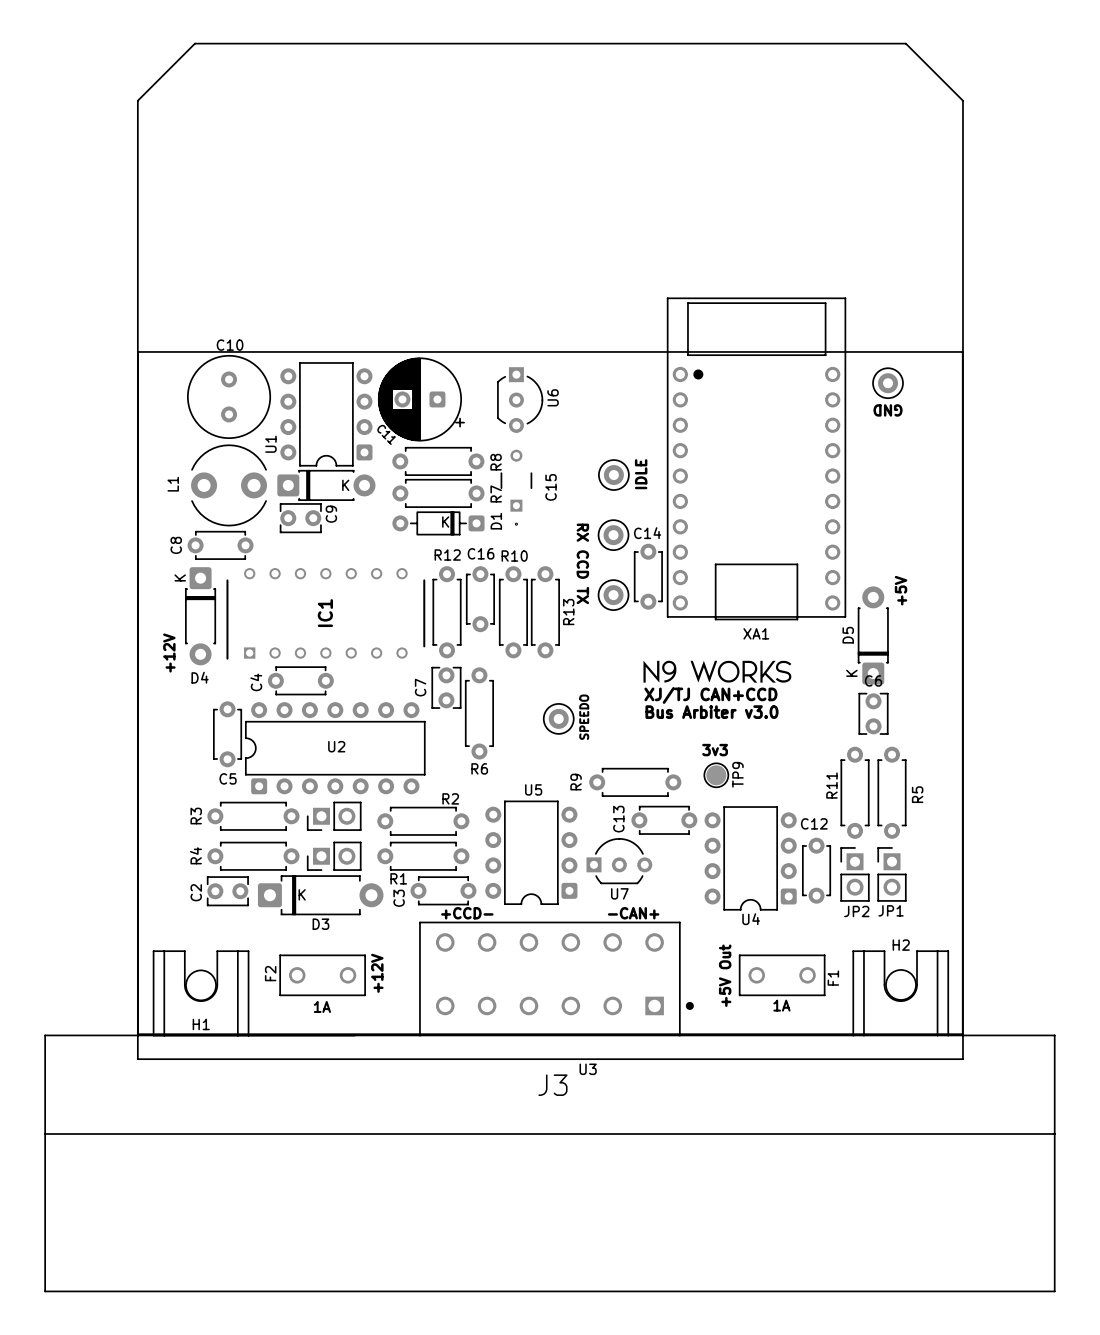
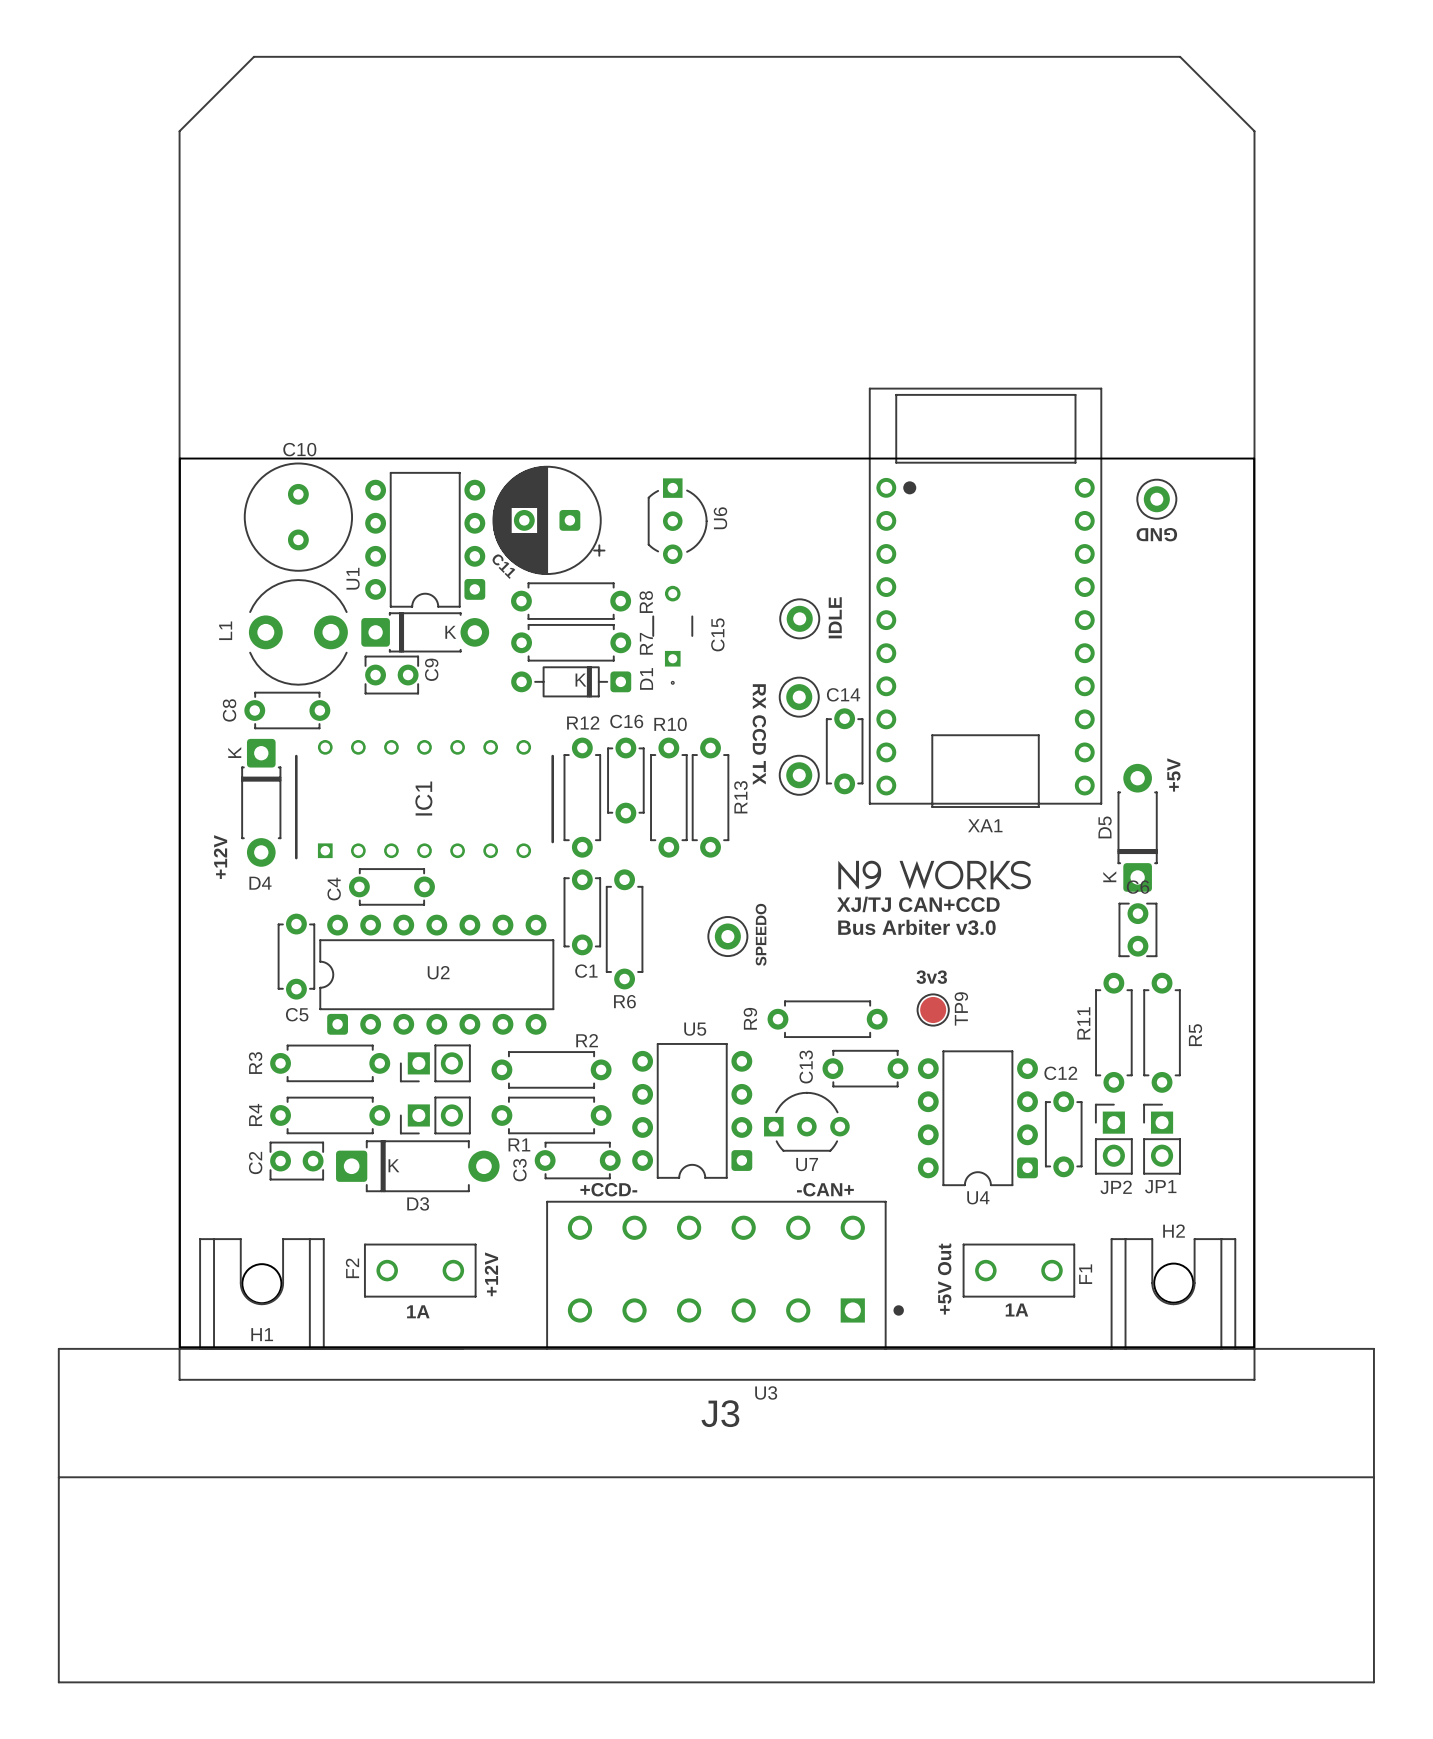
C7: (446, 687) -> none
C1: none -> (582, 912)

